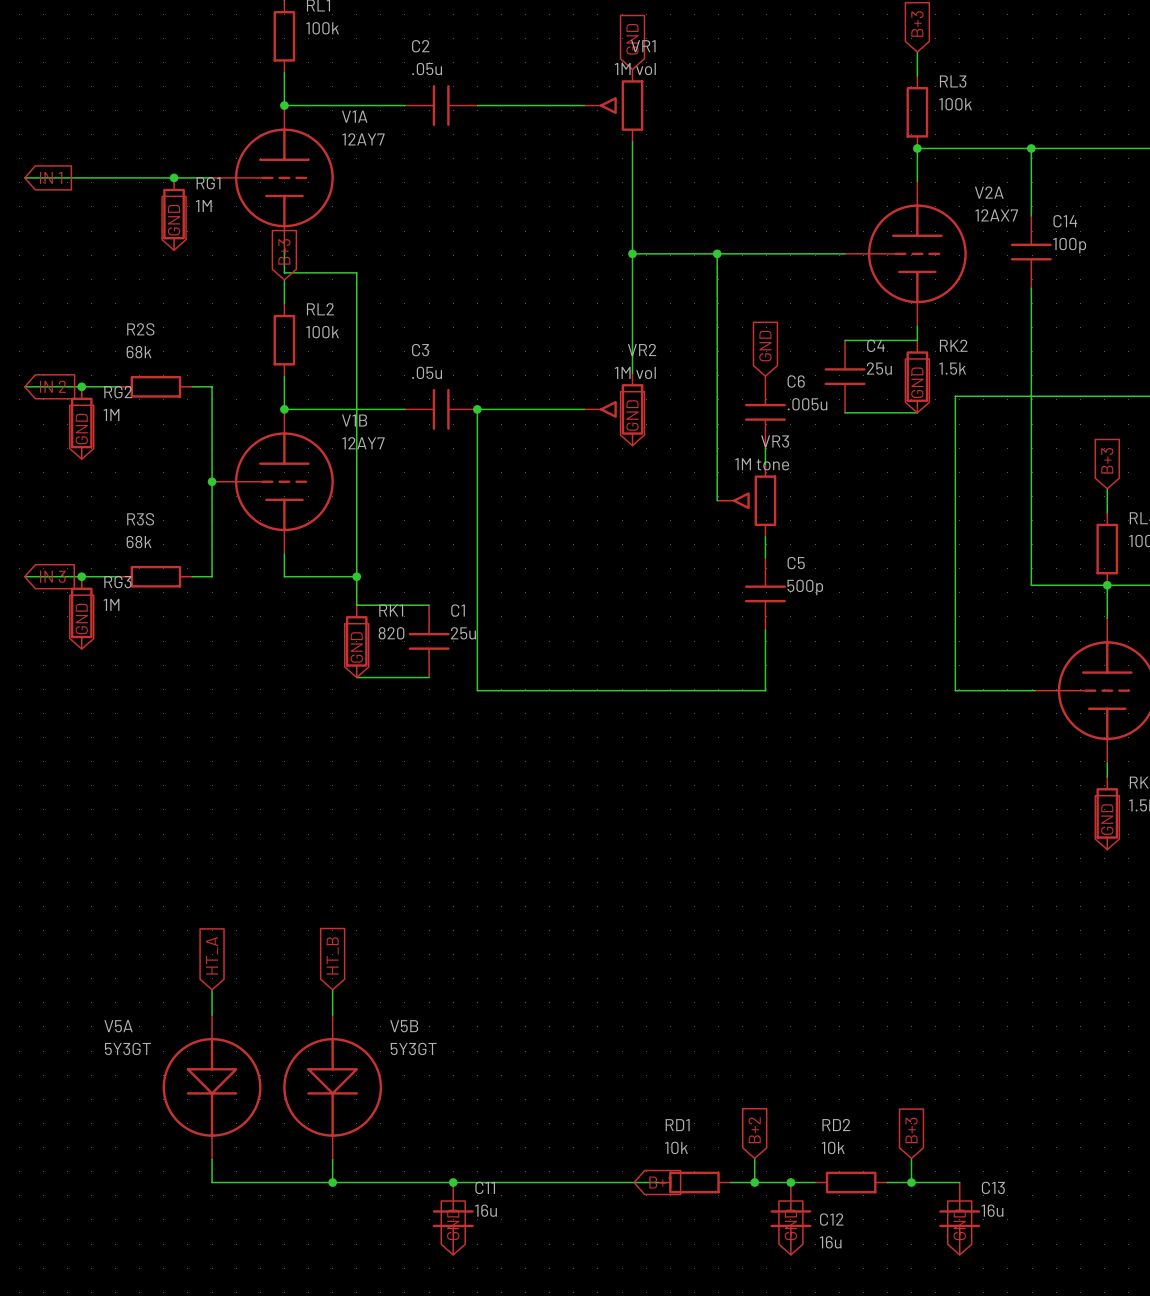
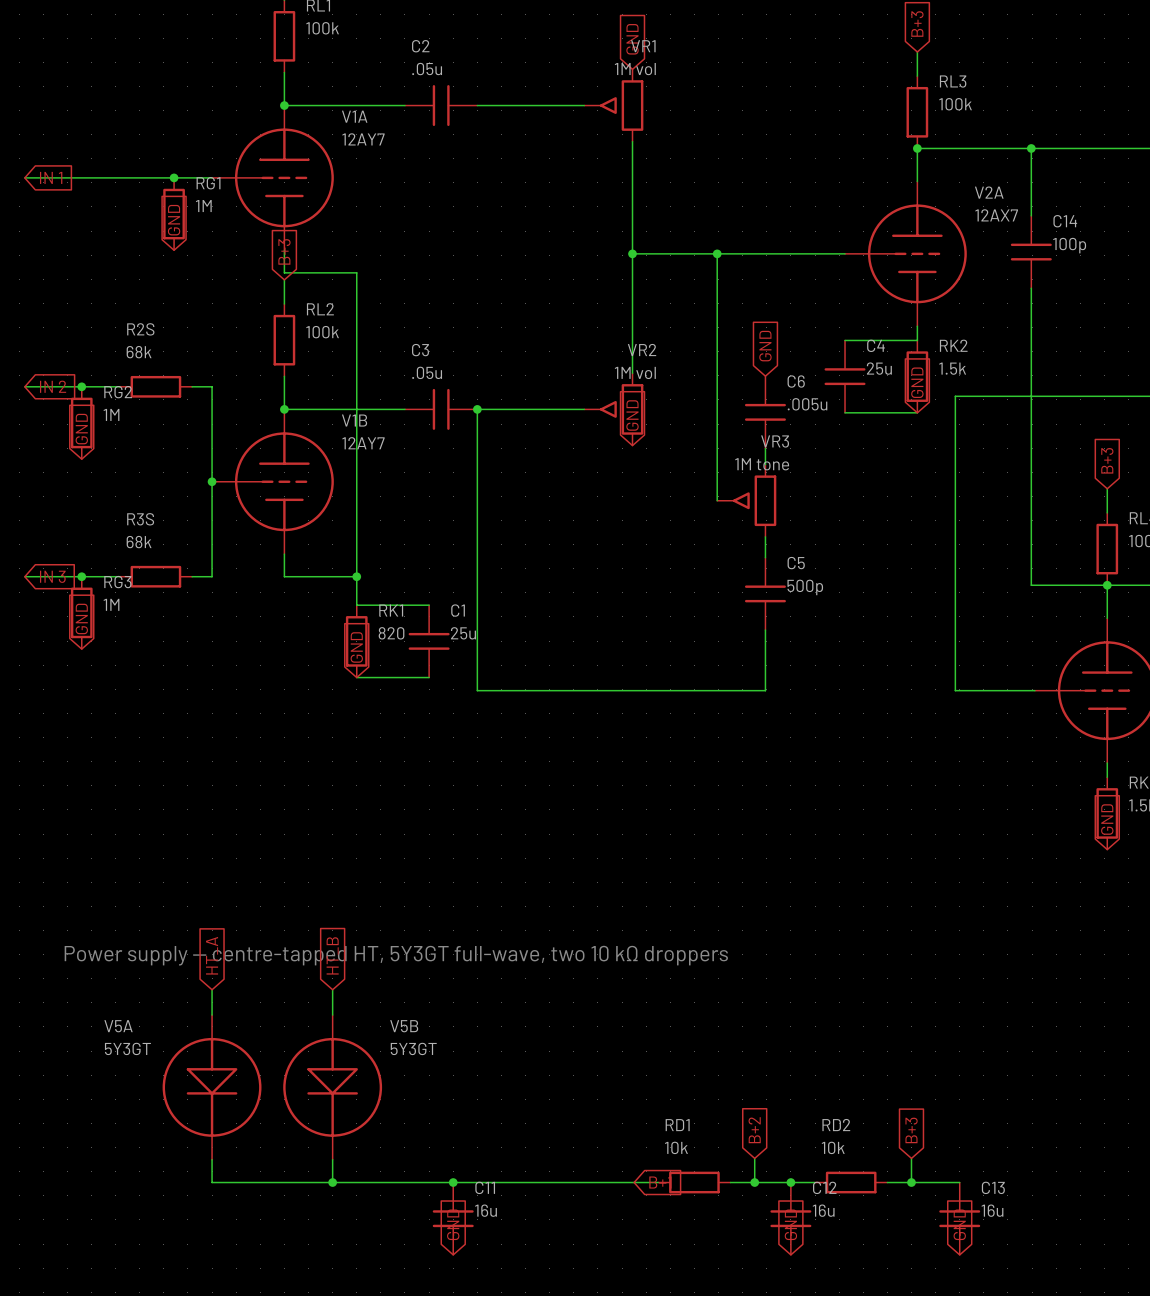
text: none -> Power supply — centre-tapped HT, 5Y3GT full-wave, two 10 kΩ droppers (396, 955)
C12 name position: C12 (831, 1219) -> C12 (824, 1187)
C12 value position: 16u (830, 1242) -> 16u (823, 1210)

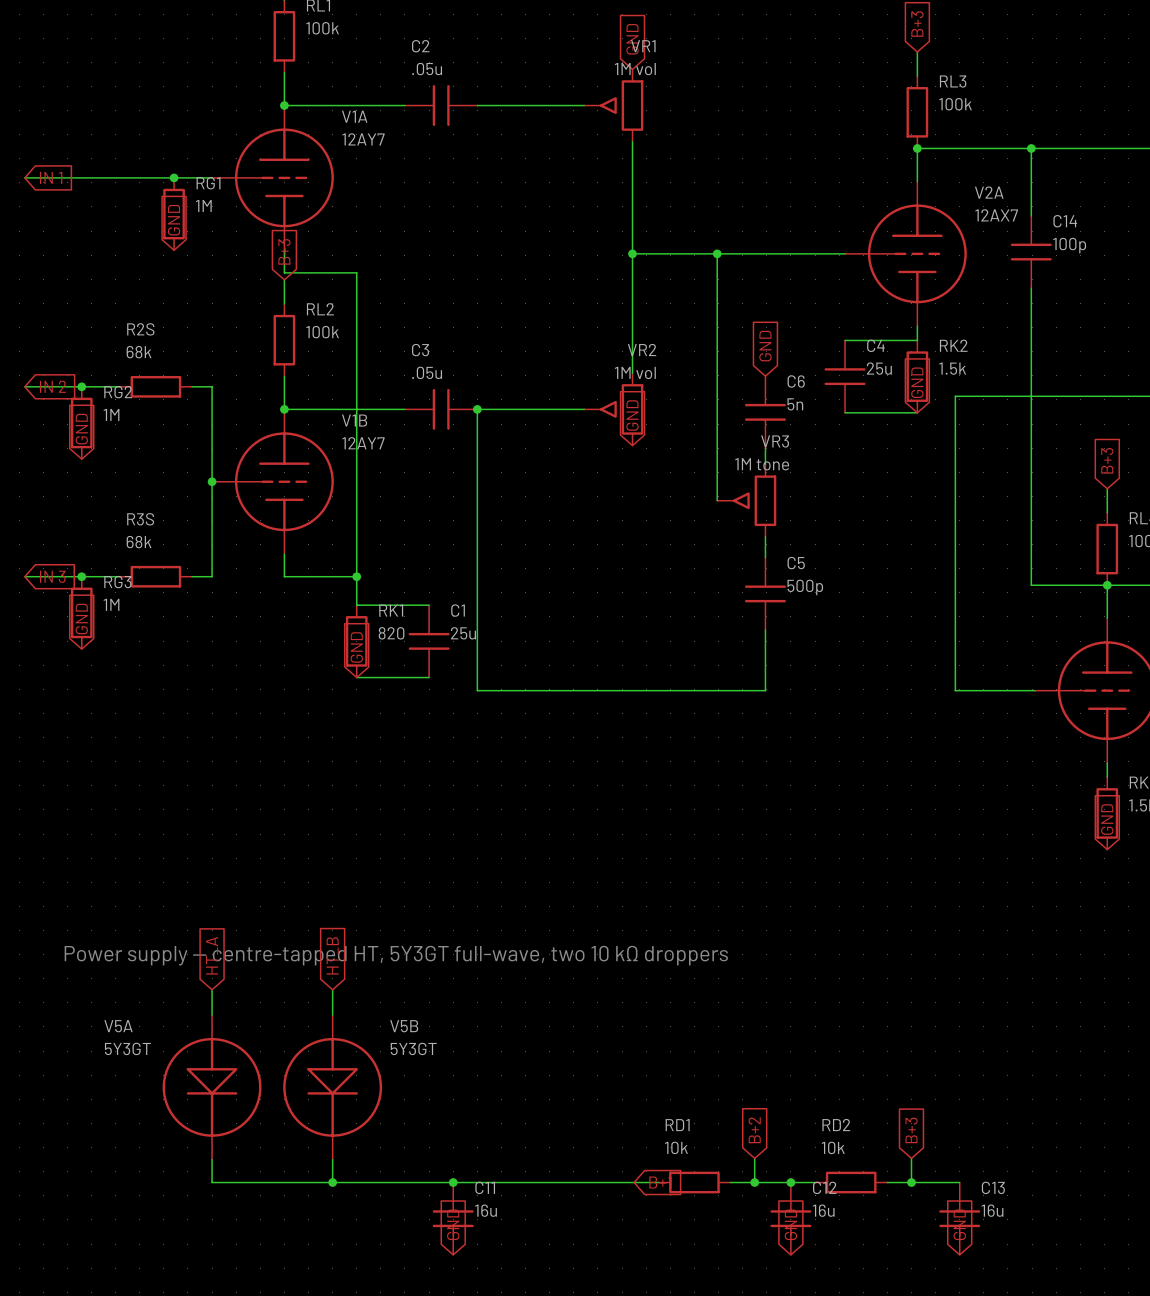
C6 value: .005u (807, 404) -> 5n (795, 404)

